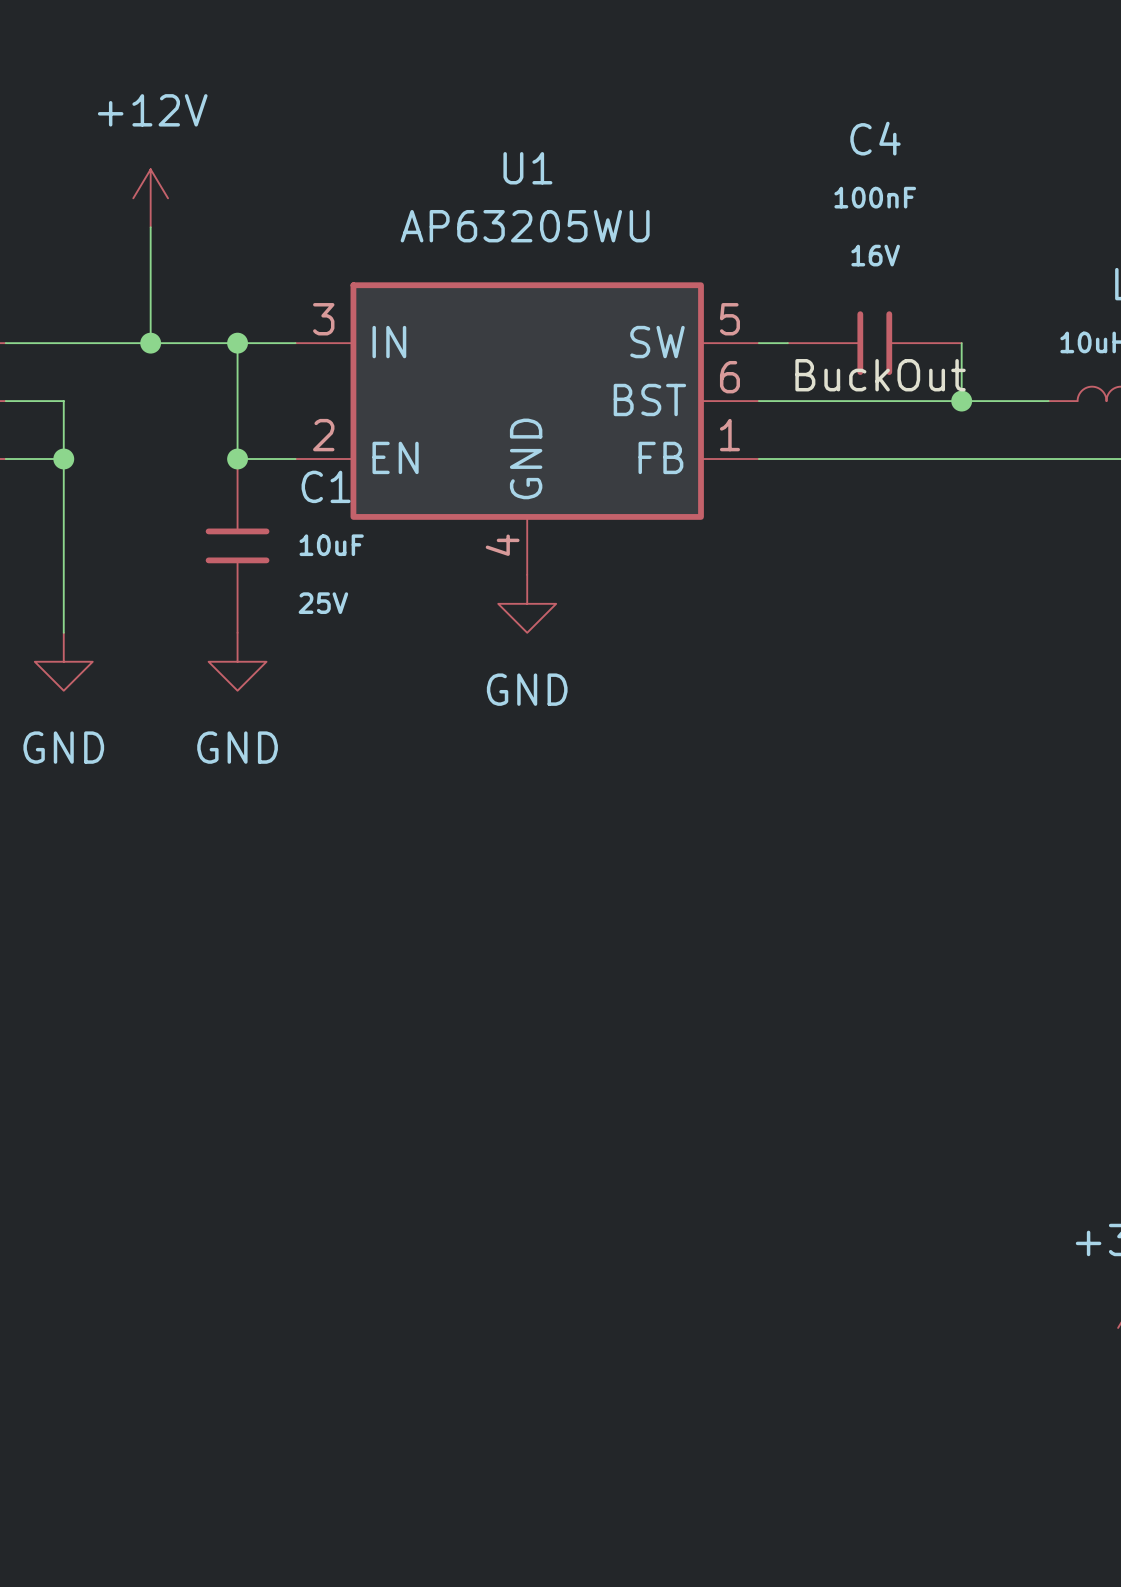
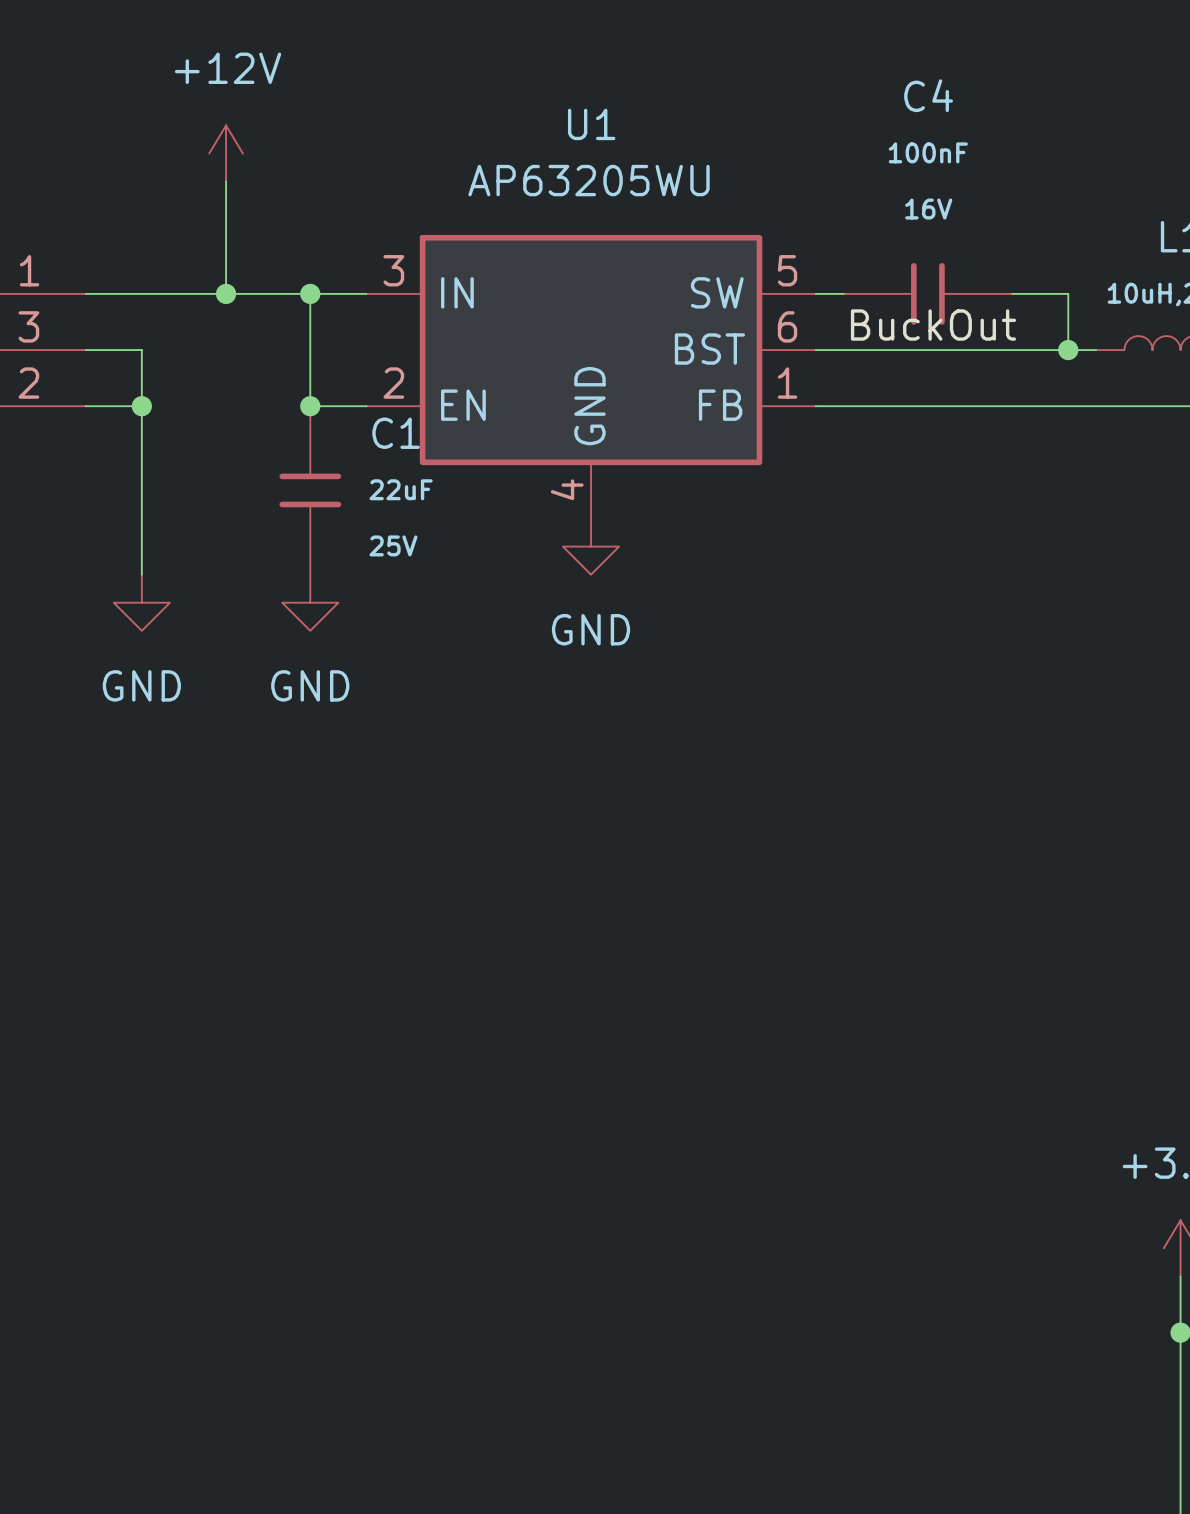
wire: (961, 343) (961, 401) -> (1012, 293) (1068, 293) (1068, 350)
junction position: (961, 401) -> (1068, 350)
C1 value: 10uF (331, 545) -> 22uF (401, 489)

